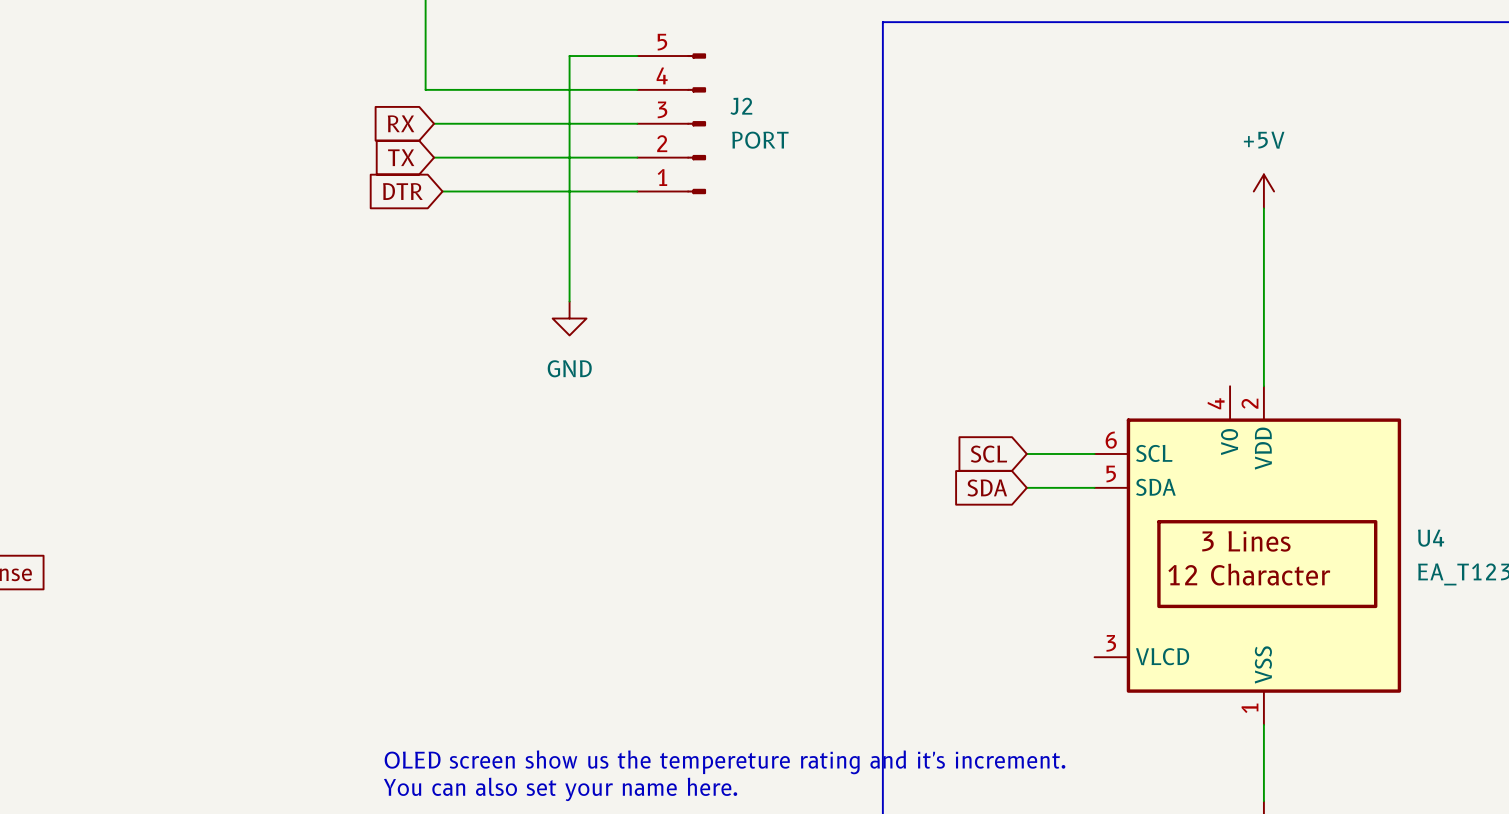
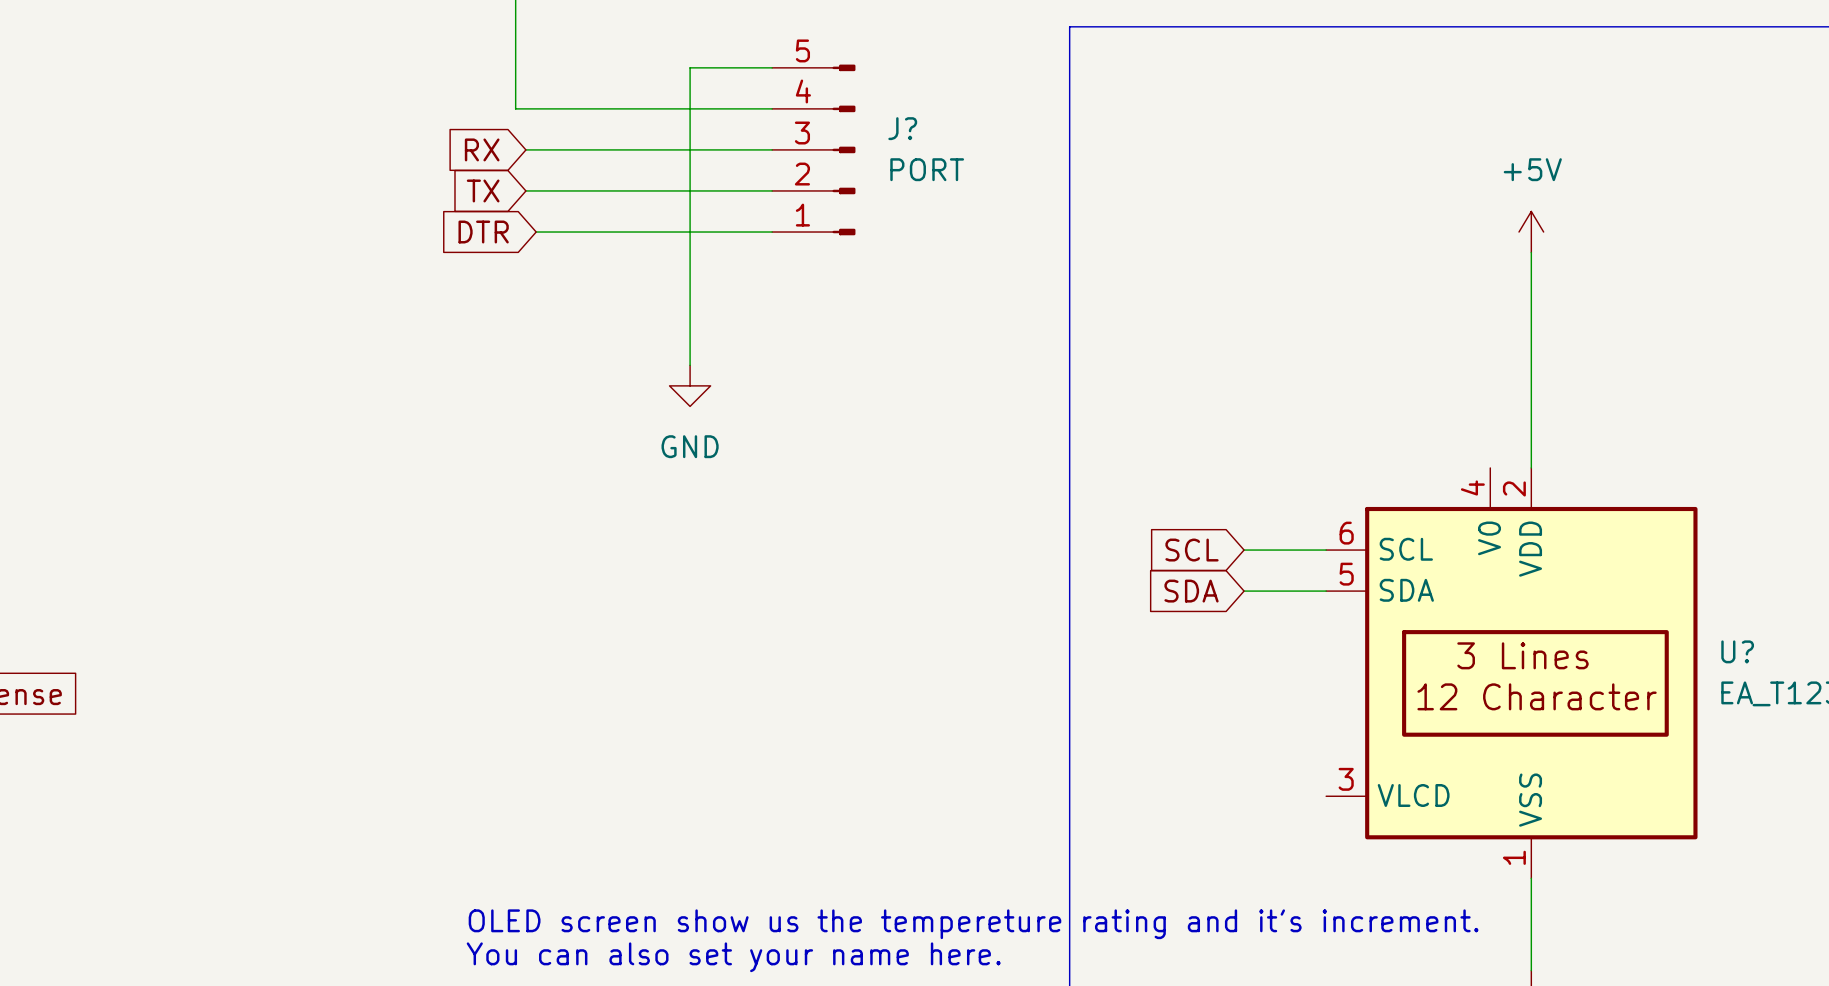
J2 name: J2 (741, 106) -> J? (902, 128)
U4 name: U4 (1431, 538) -> U? (1737, 651)

